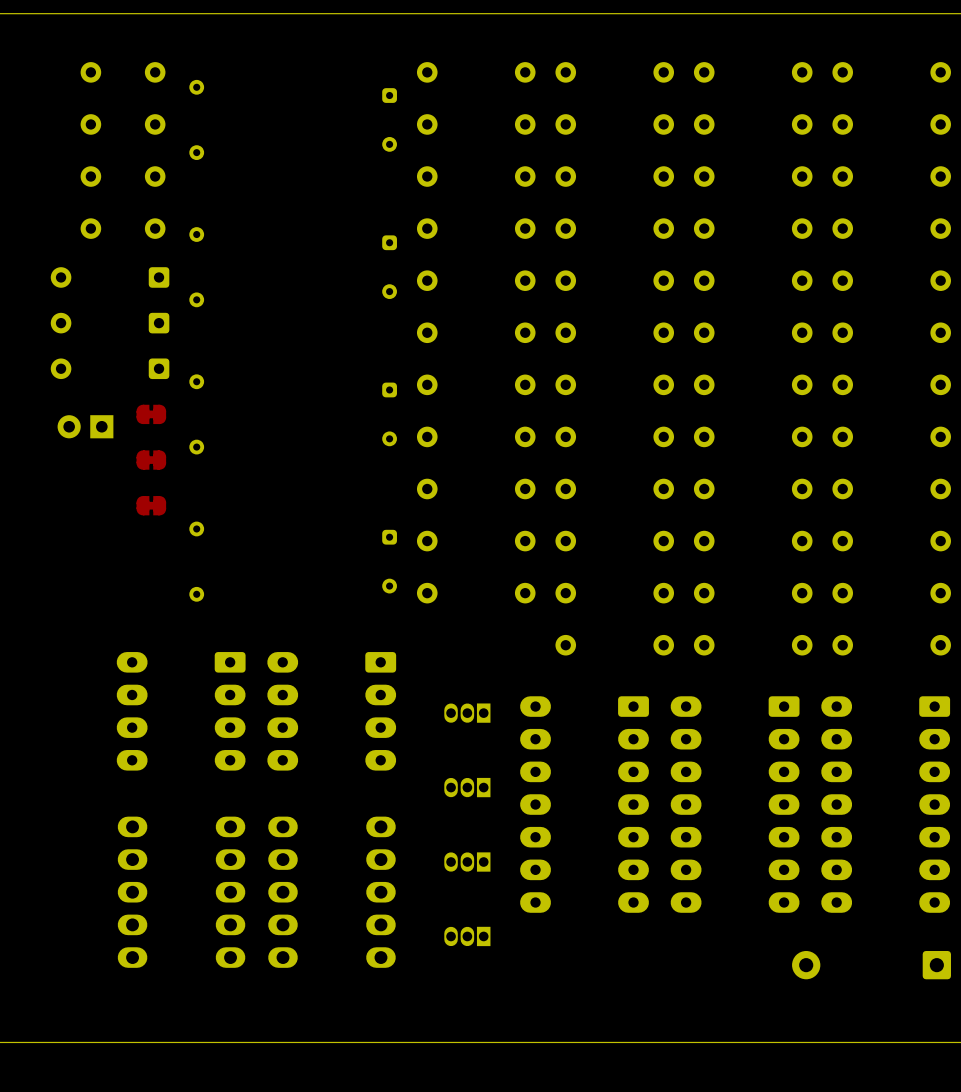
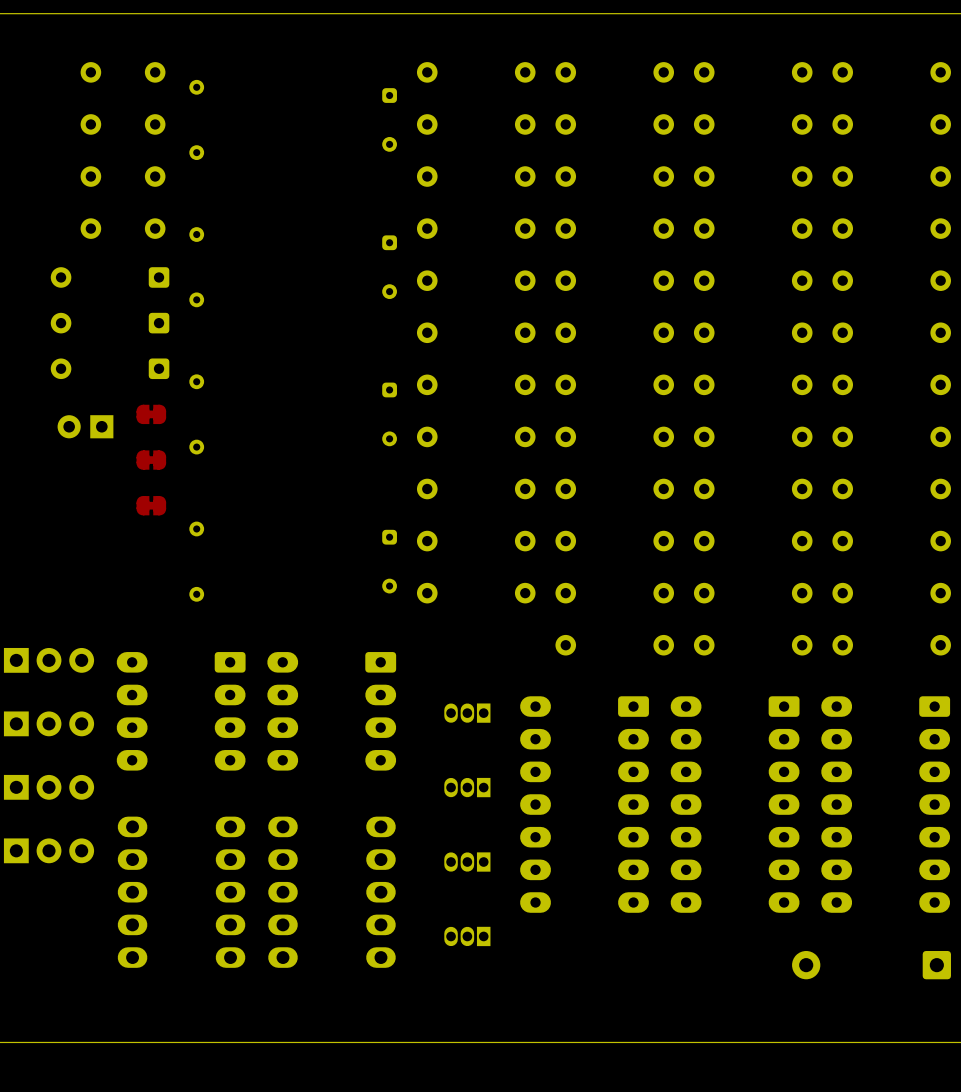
part: none -> (49, 660)
part: none -> (49, 723)
part: none -> (49, 787)
part: none -> (49, 850)

